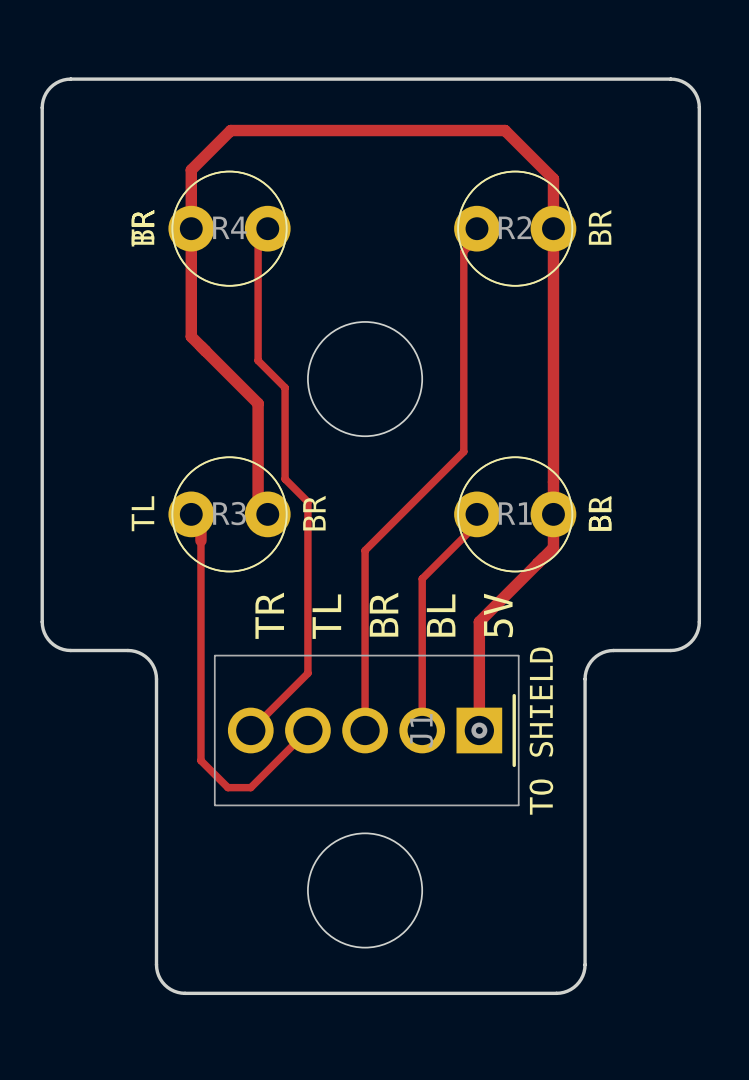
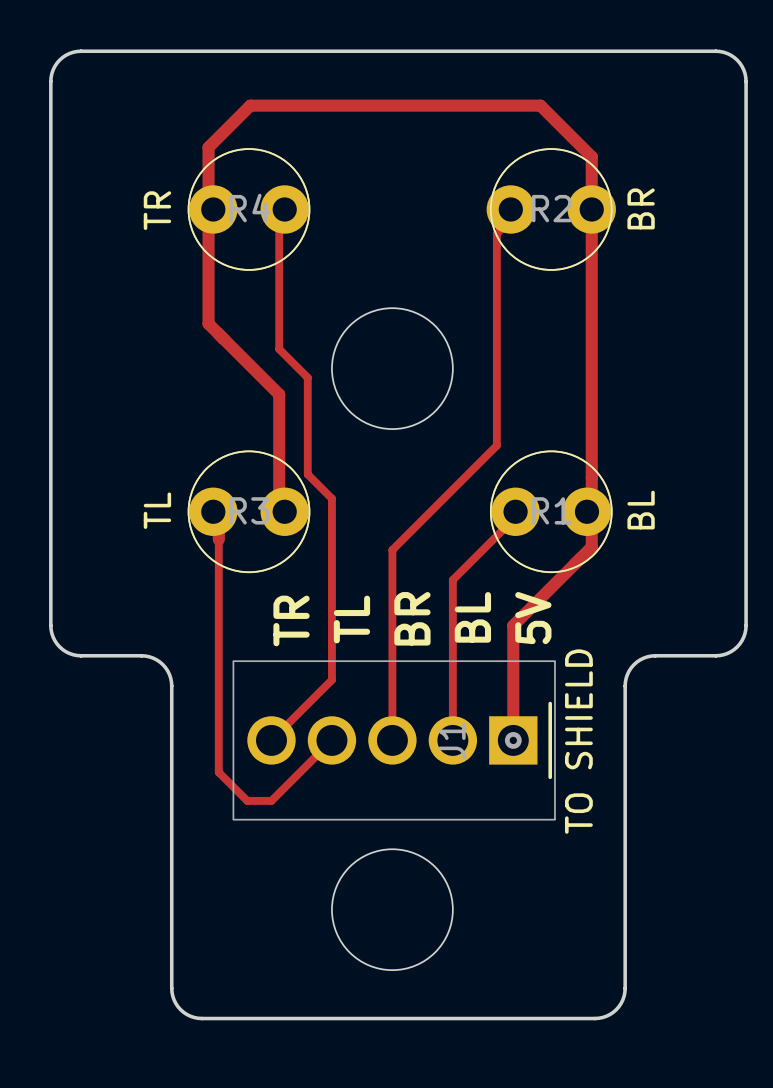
R4 footprint: [168, 170, 291, 287] -> [187, 148, 311, 271]
R3 footprint: [168, 456, 291, 573] -> [187, 450, 311, 573]
R1 footprint: [454, 456, 577, 573] -> [490, 450, 613, 573]

